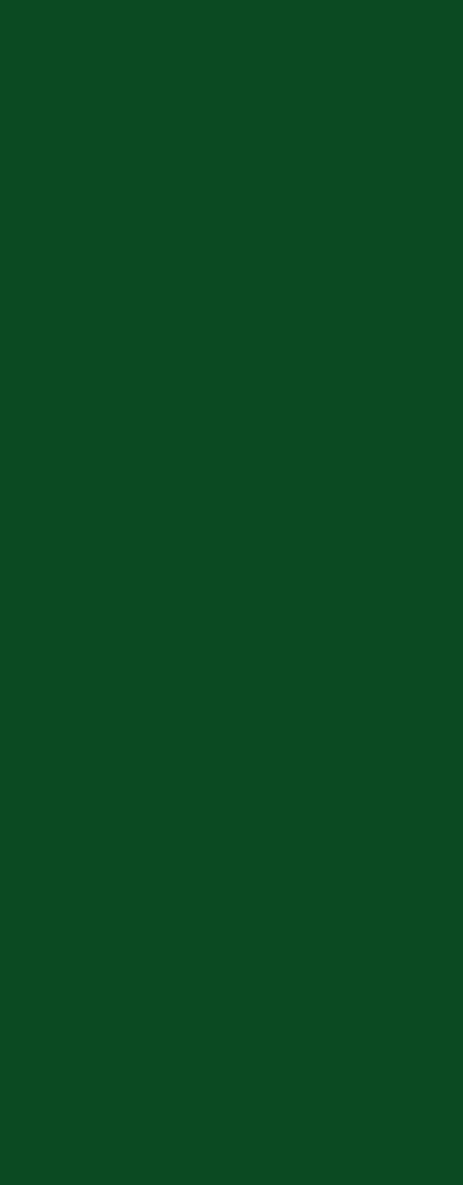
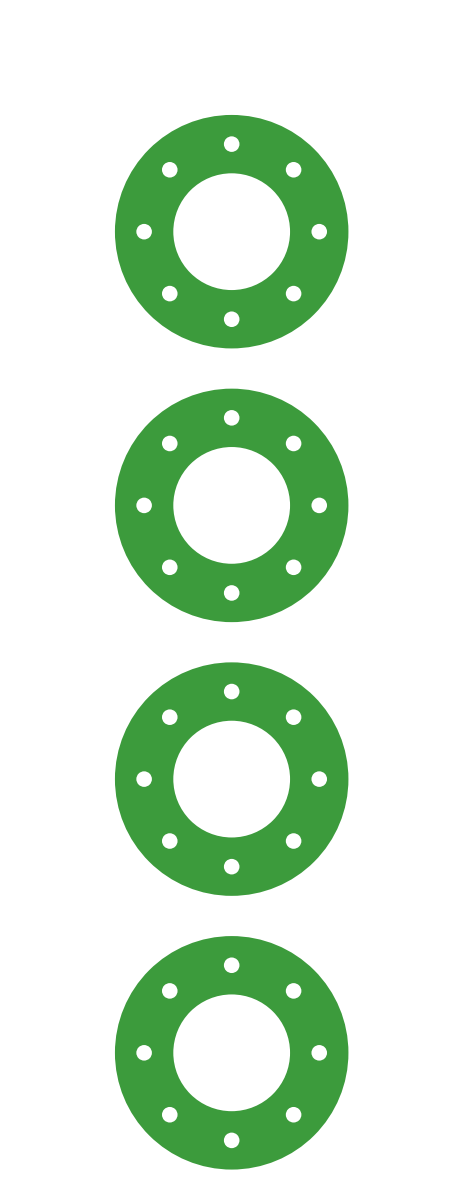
part: none -> (231, 231)
part: none -> (231, 505)
part: none -> (231, 779)
part: none -> (231, 1052)

